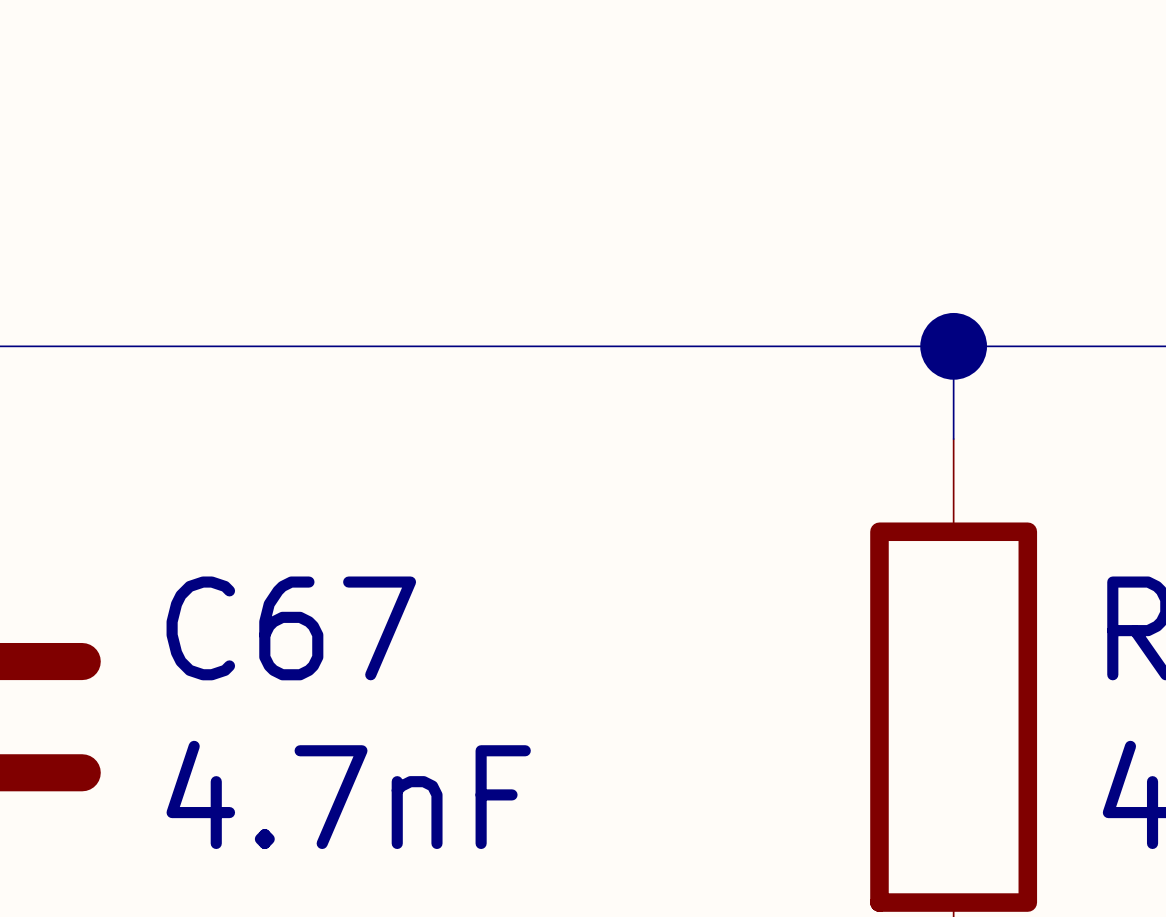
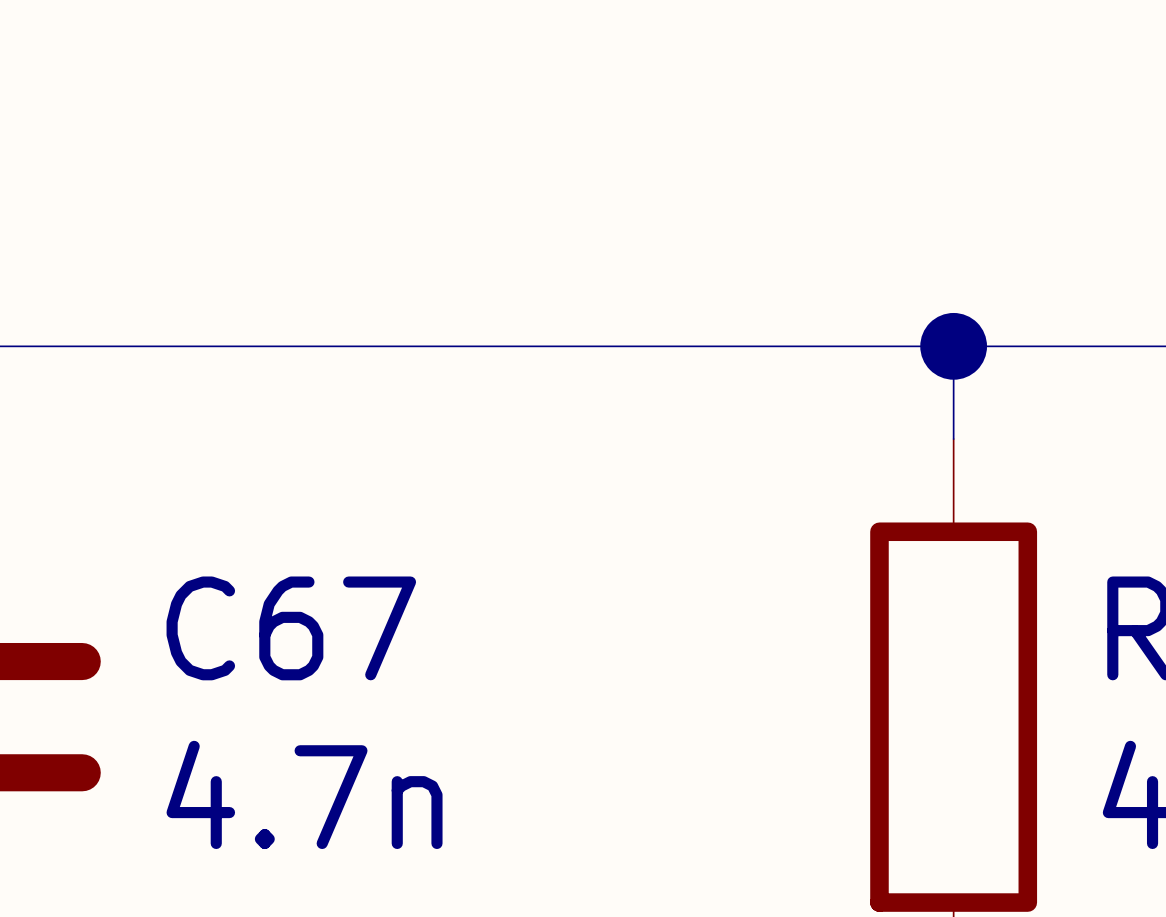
C67 value: 4.7nF (348, 794) -> 4.7n (304, 794)

